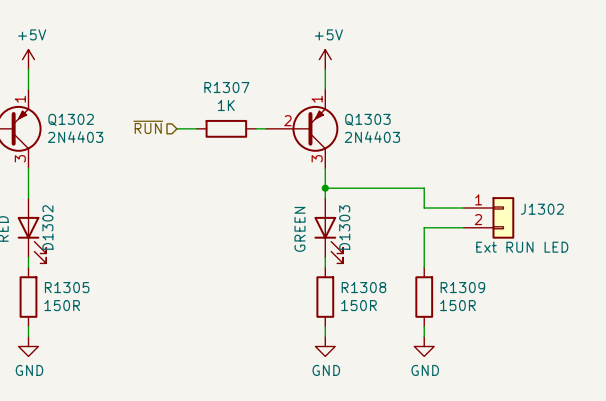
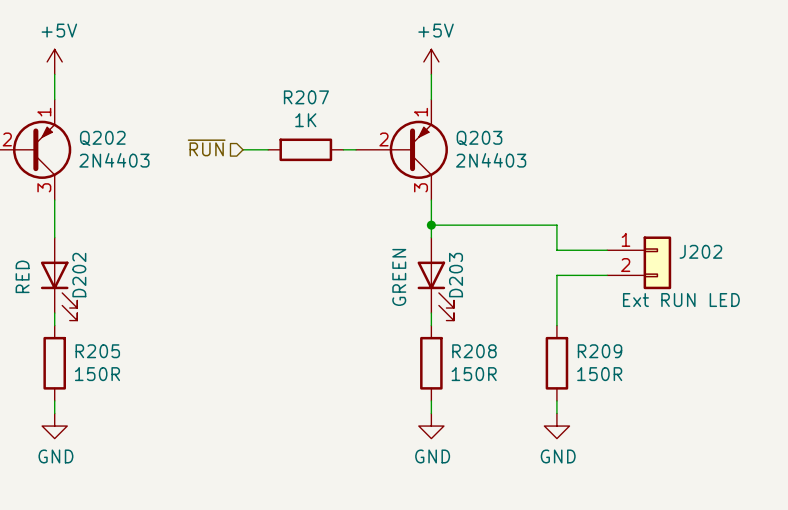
R1307 name: R1307 (226, 87) -> R207 (306, 97)
Q1302 name: Q1302 (71, 119) -> Q202 (102, 138)
Q1303 name: Q1303 (367, 119) -> Q203 (479, 138)
J1302 name: J1302 (542, 209) -> J202 (700, 251)
D1302 name: D1302 (47, 227) -> D202 (79, 275)
D1303 name: D1303 (344, 227) -> D203 (456, 275)
R1305 name: R1305 (67, 287) -> R205 (97, 351)
R1308 name: R1308 (363, 287) -> R208 (474, 351)
R1309 name: R1309 (462, 287) -> R209 (600, 351)

